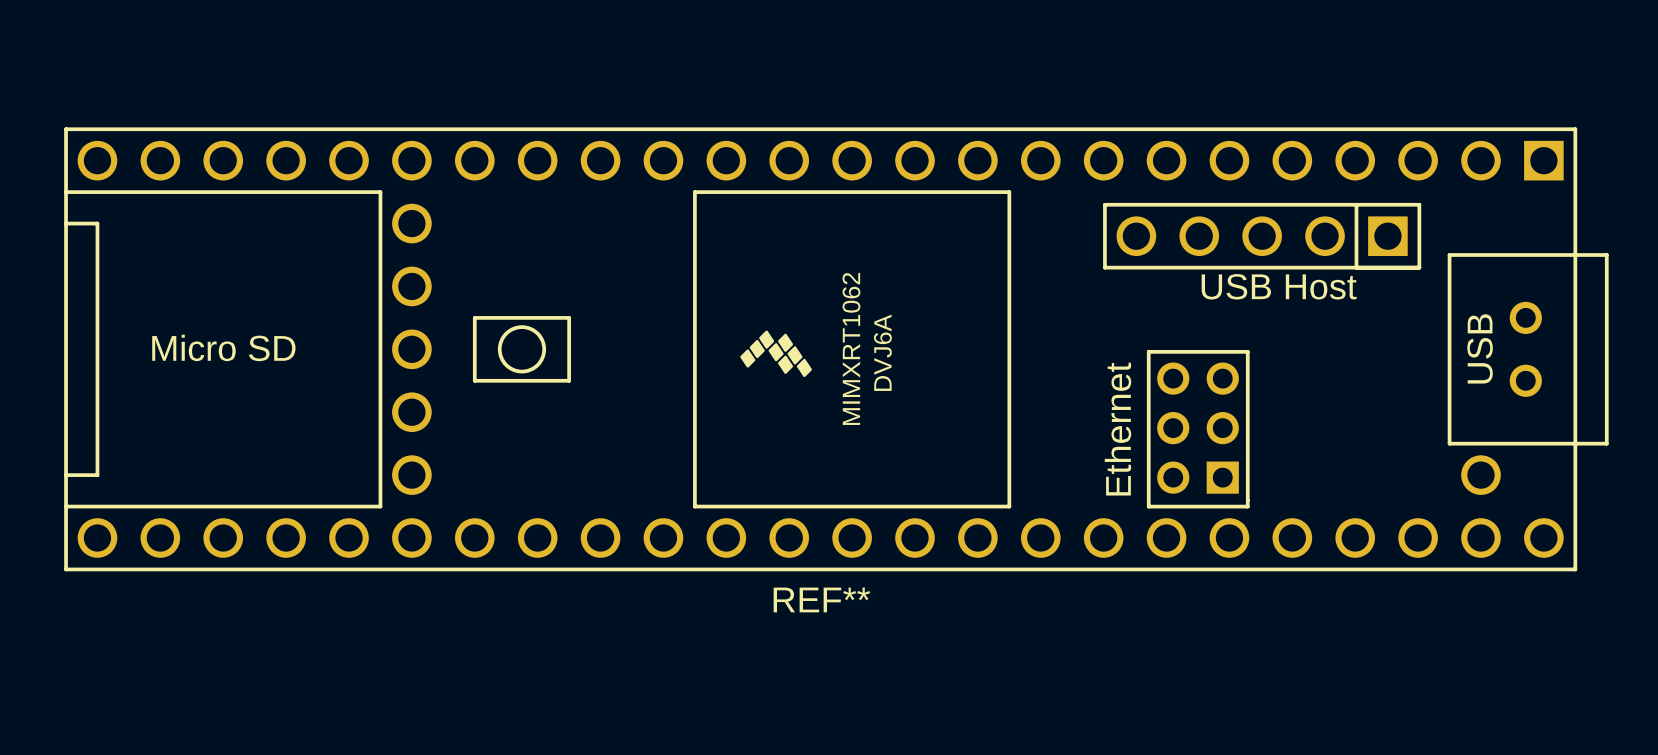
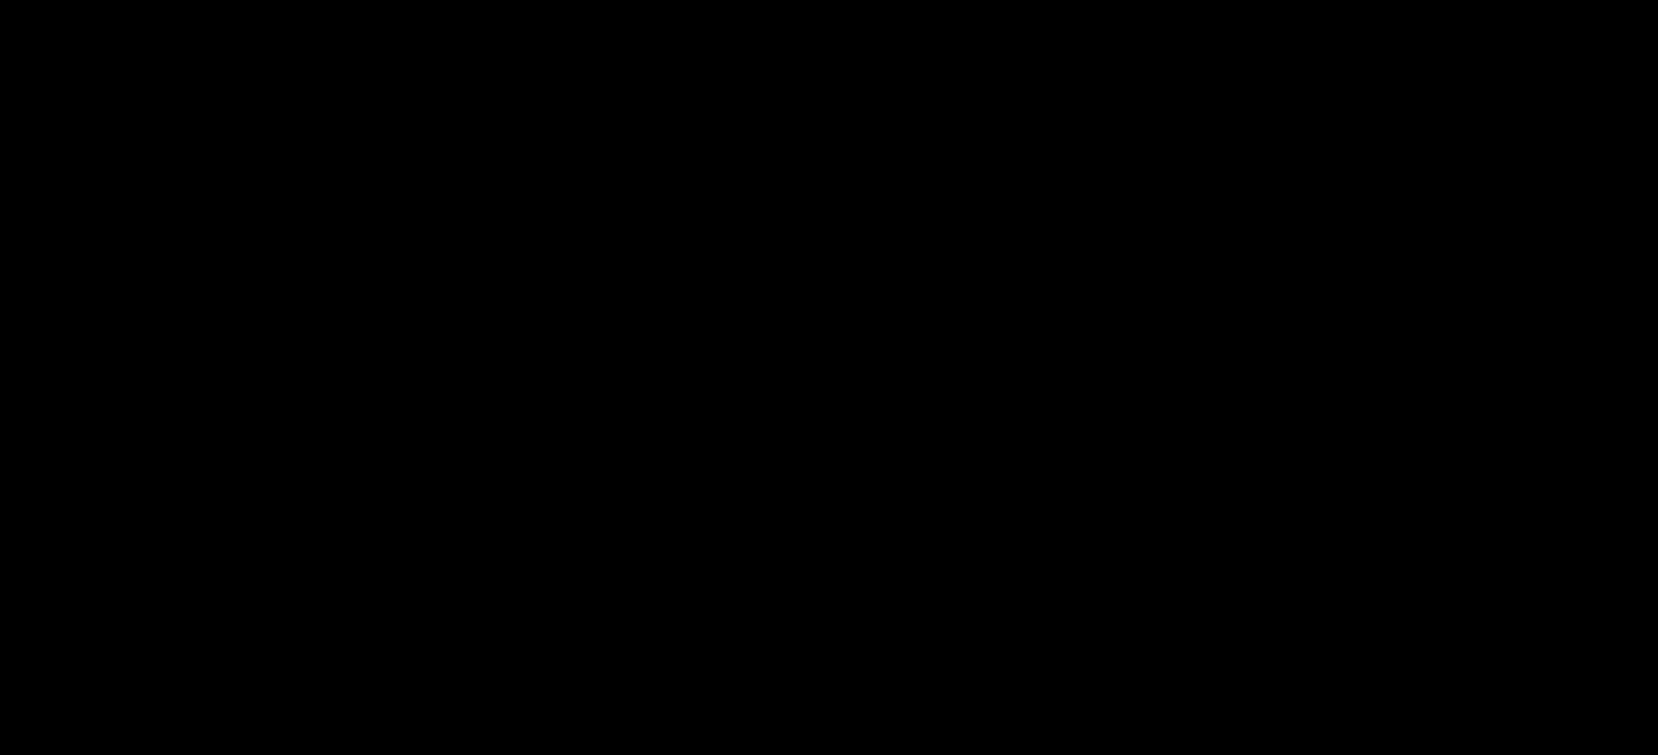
REF**: (836, 349) -> none

